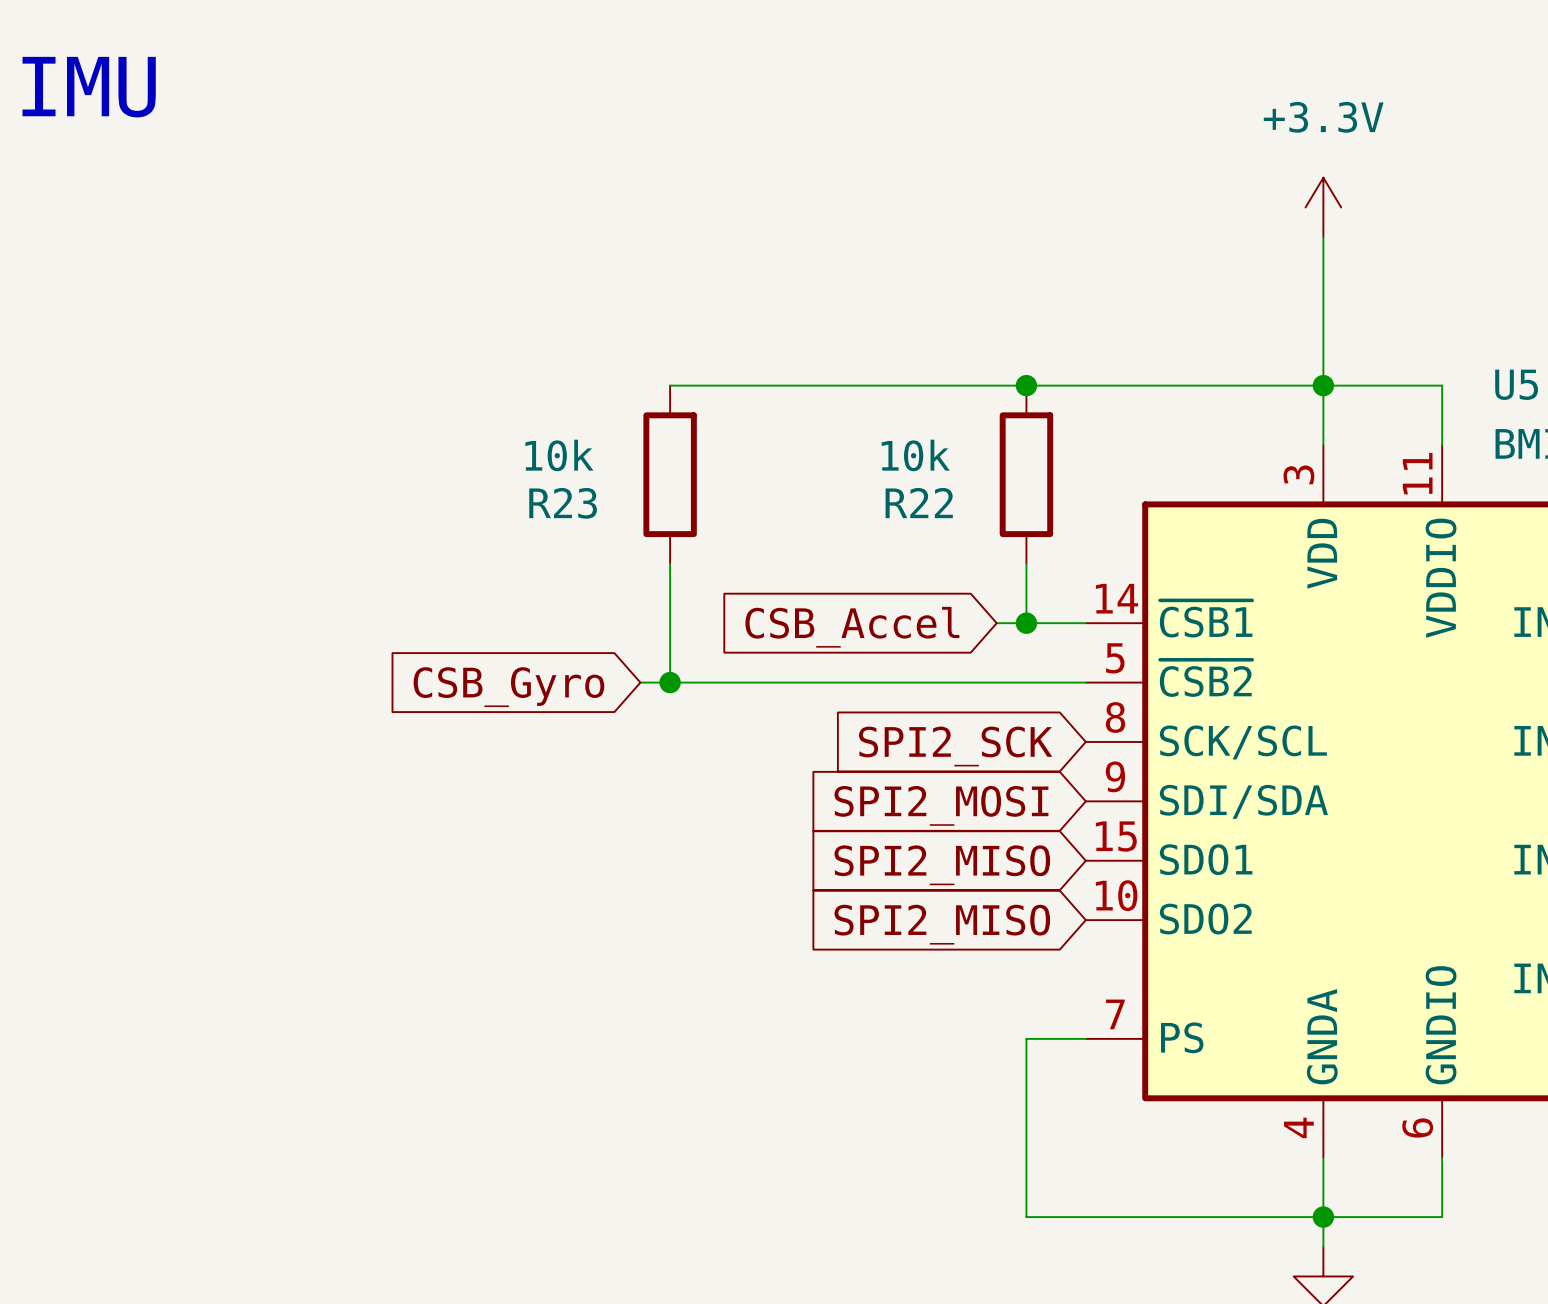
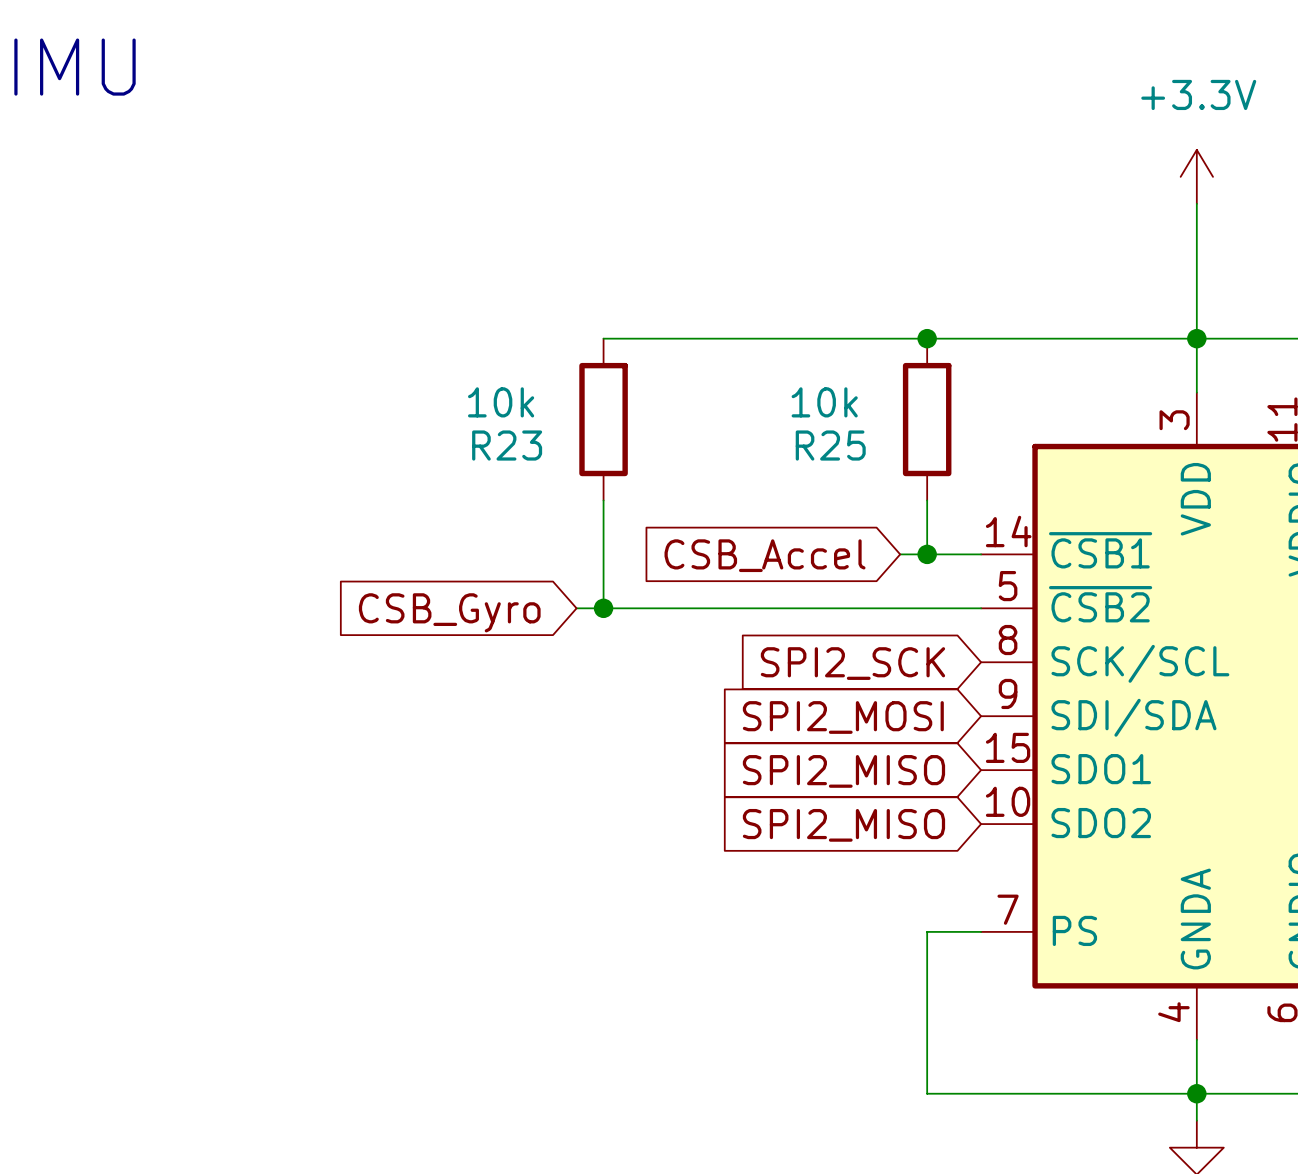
R22 name: R22 (919, 503) -> R25 (830, 445)

